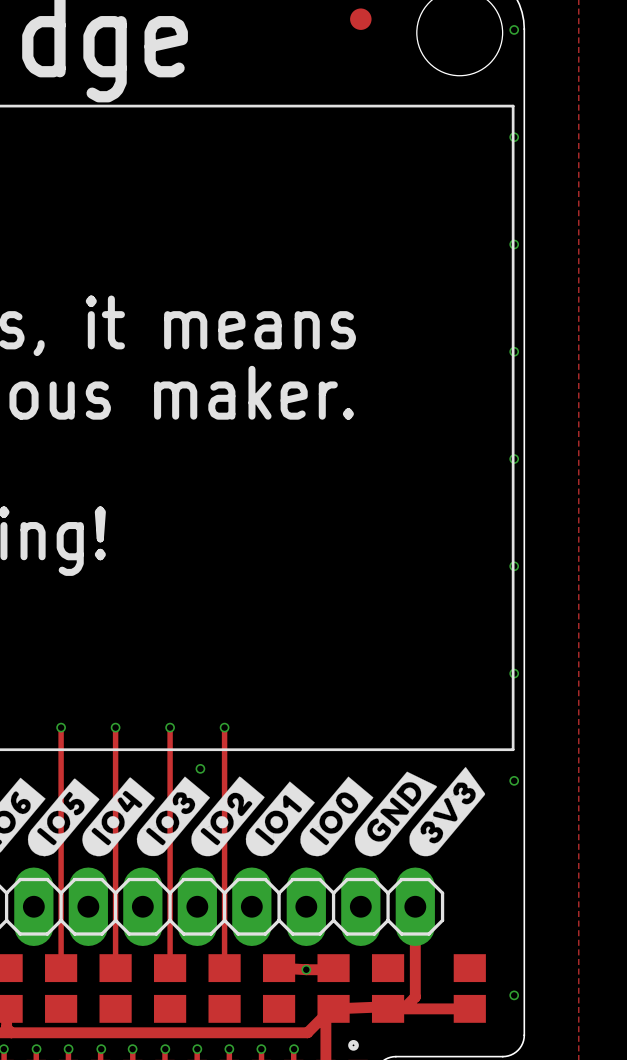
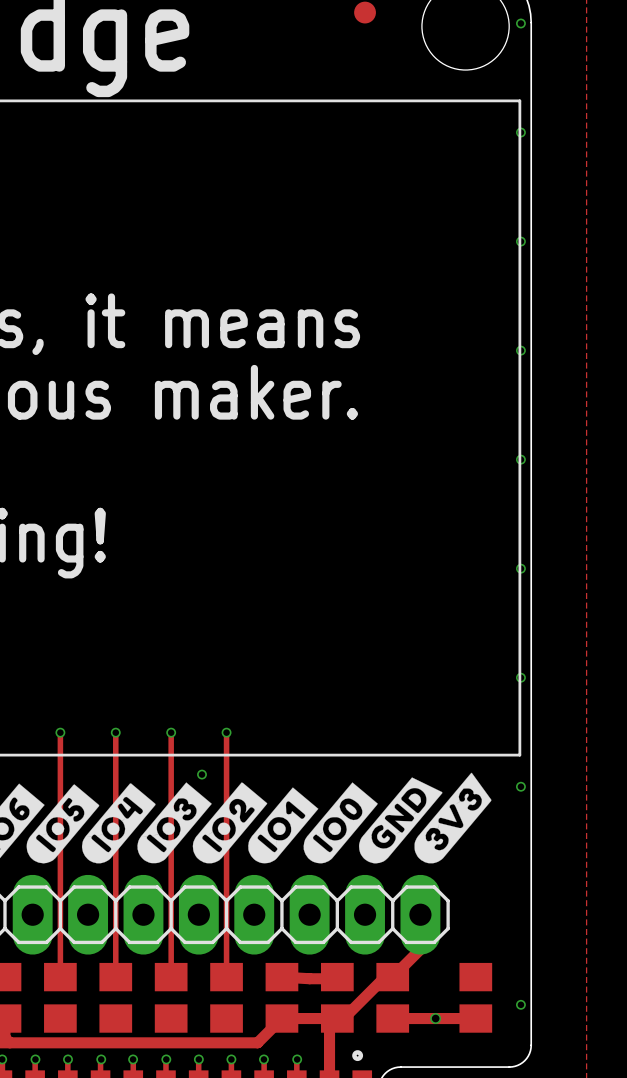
track: (415, 940) (415, 997) (405, 1007) (333, 1008) (307, 1032) (255, 1032) -> (420, 949) (392, 977) (385, 977) (343, 1018) (281, 1018) (257, 1042)
via: (306, 969) -> none
via: none -> (435, 1018)

